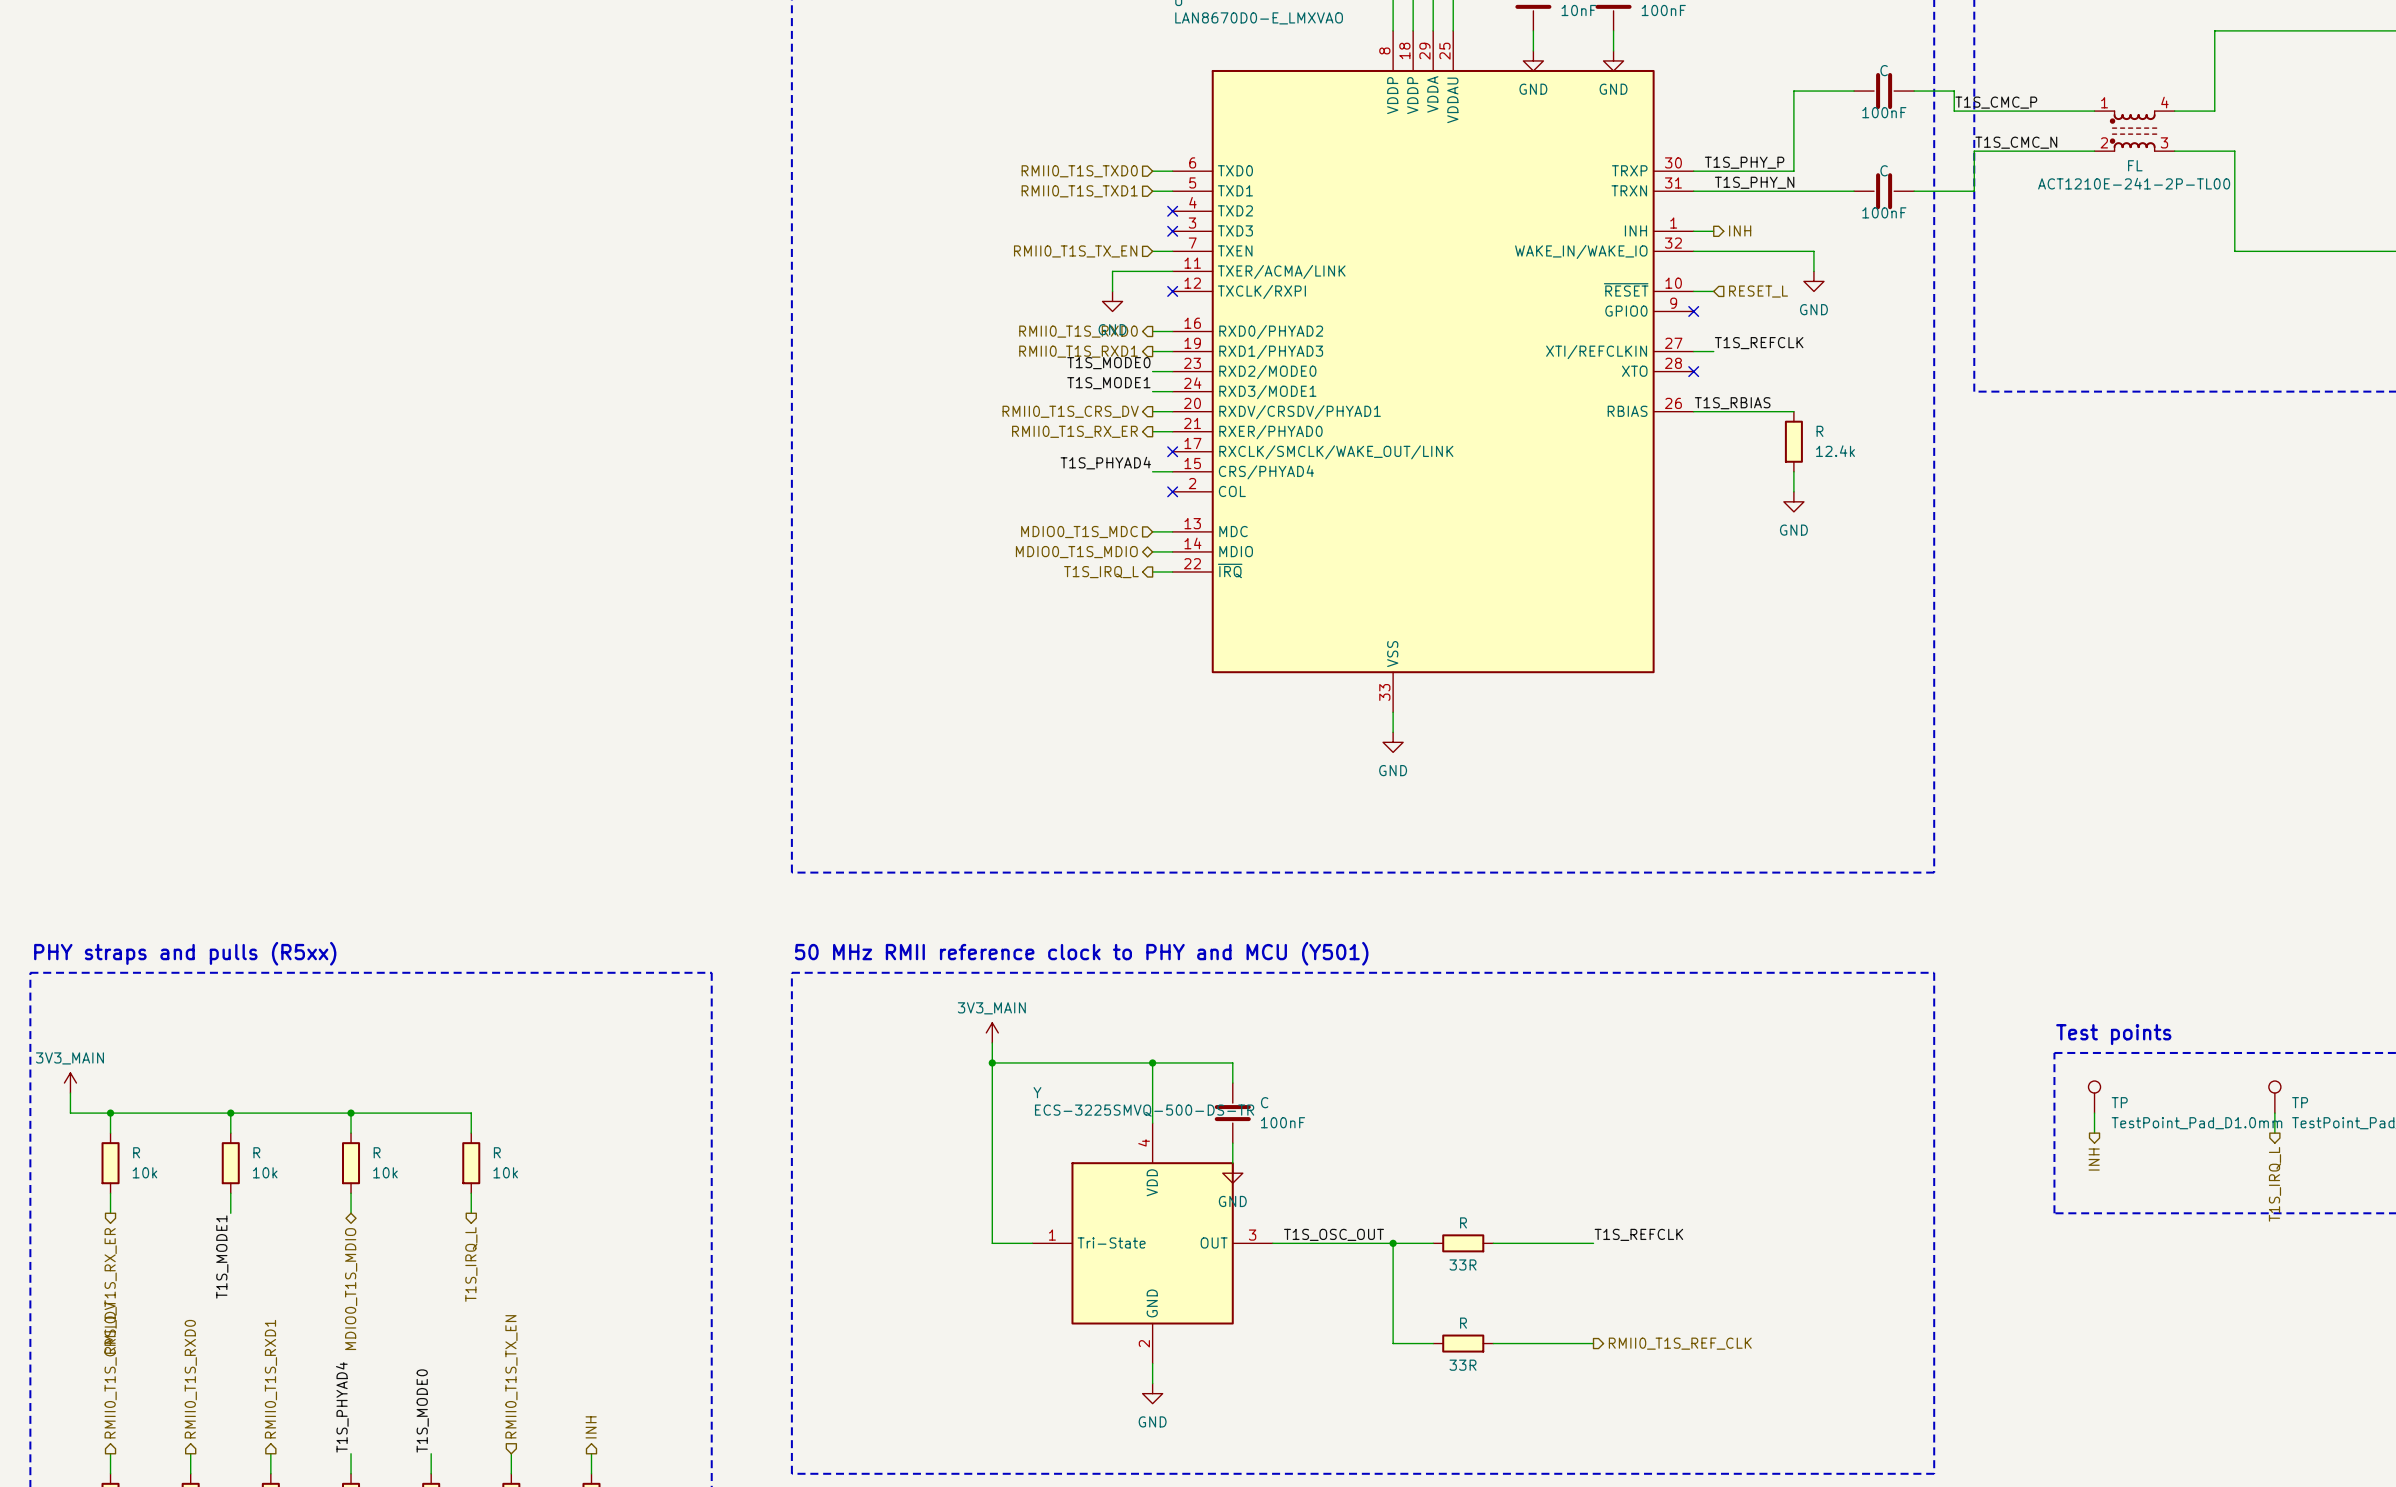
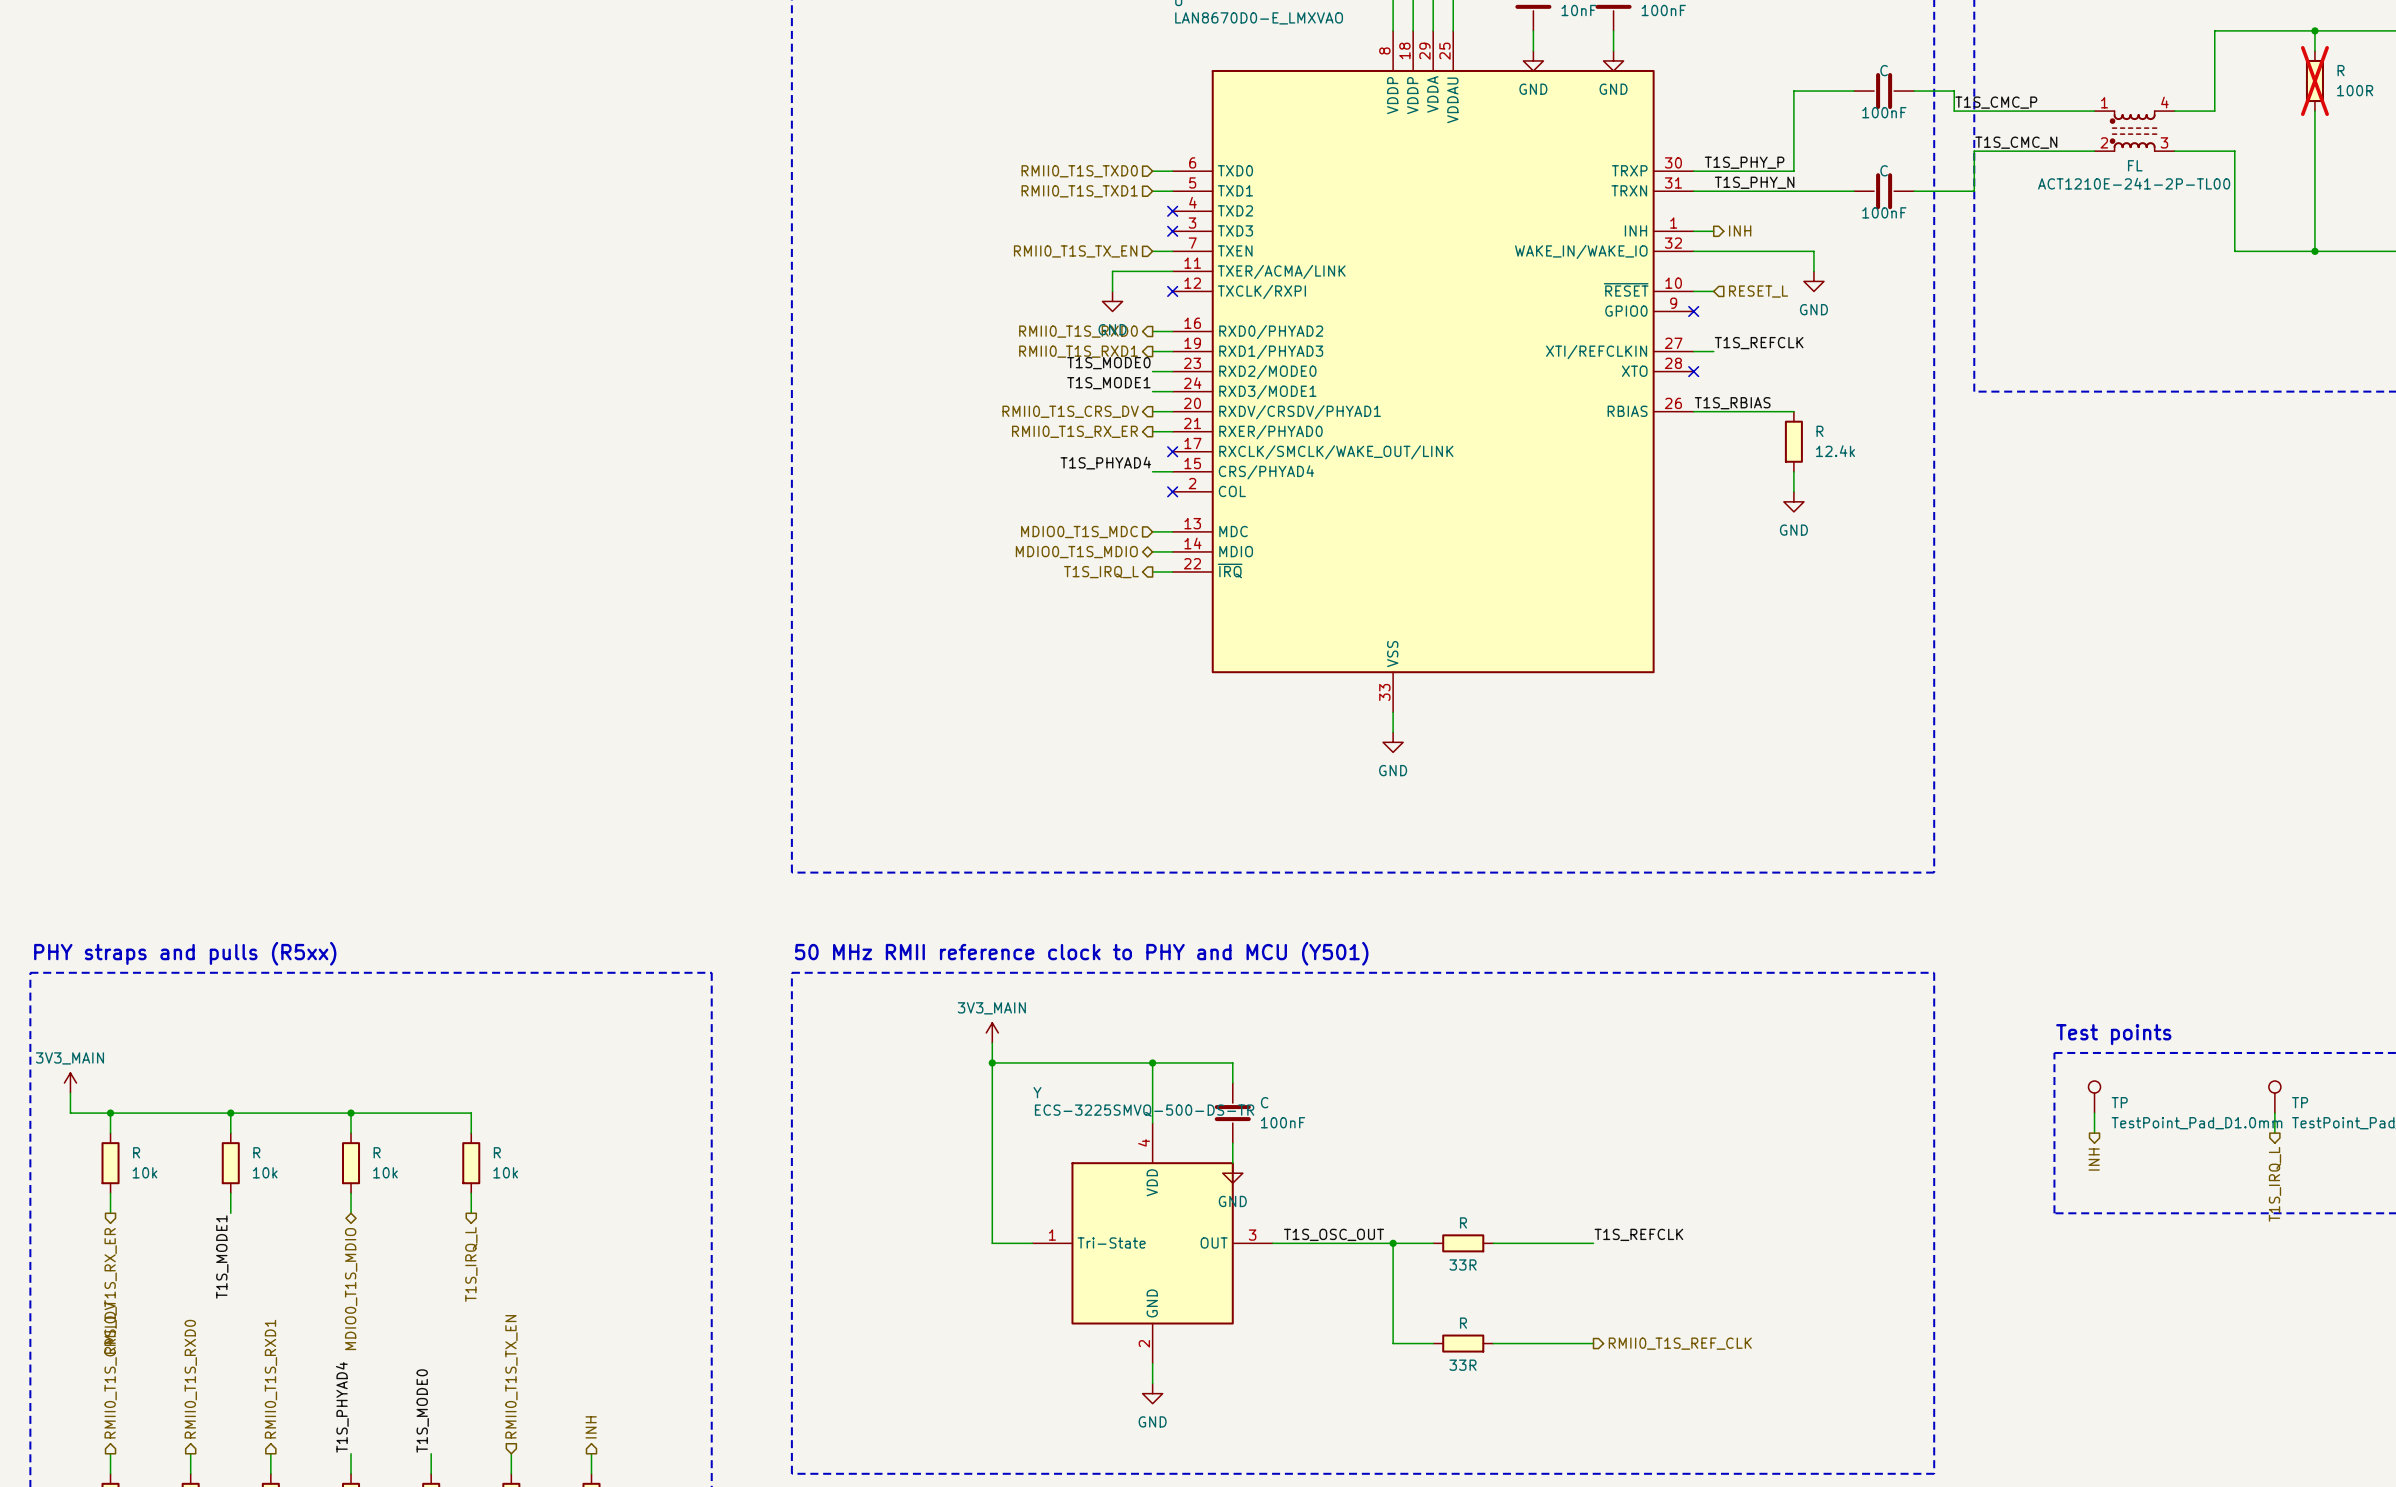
wire: none -> (2314, 30) (2314, 50)
junction: none -> (2314, 30)
R: none -> 100R (2314, 81)
wire: none -> (2314, 111) (2314, 251)
junction: none -> (2314, 251)

